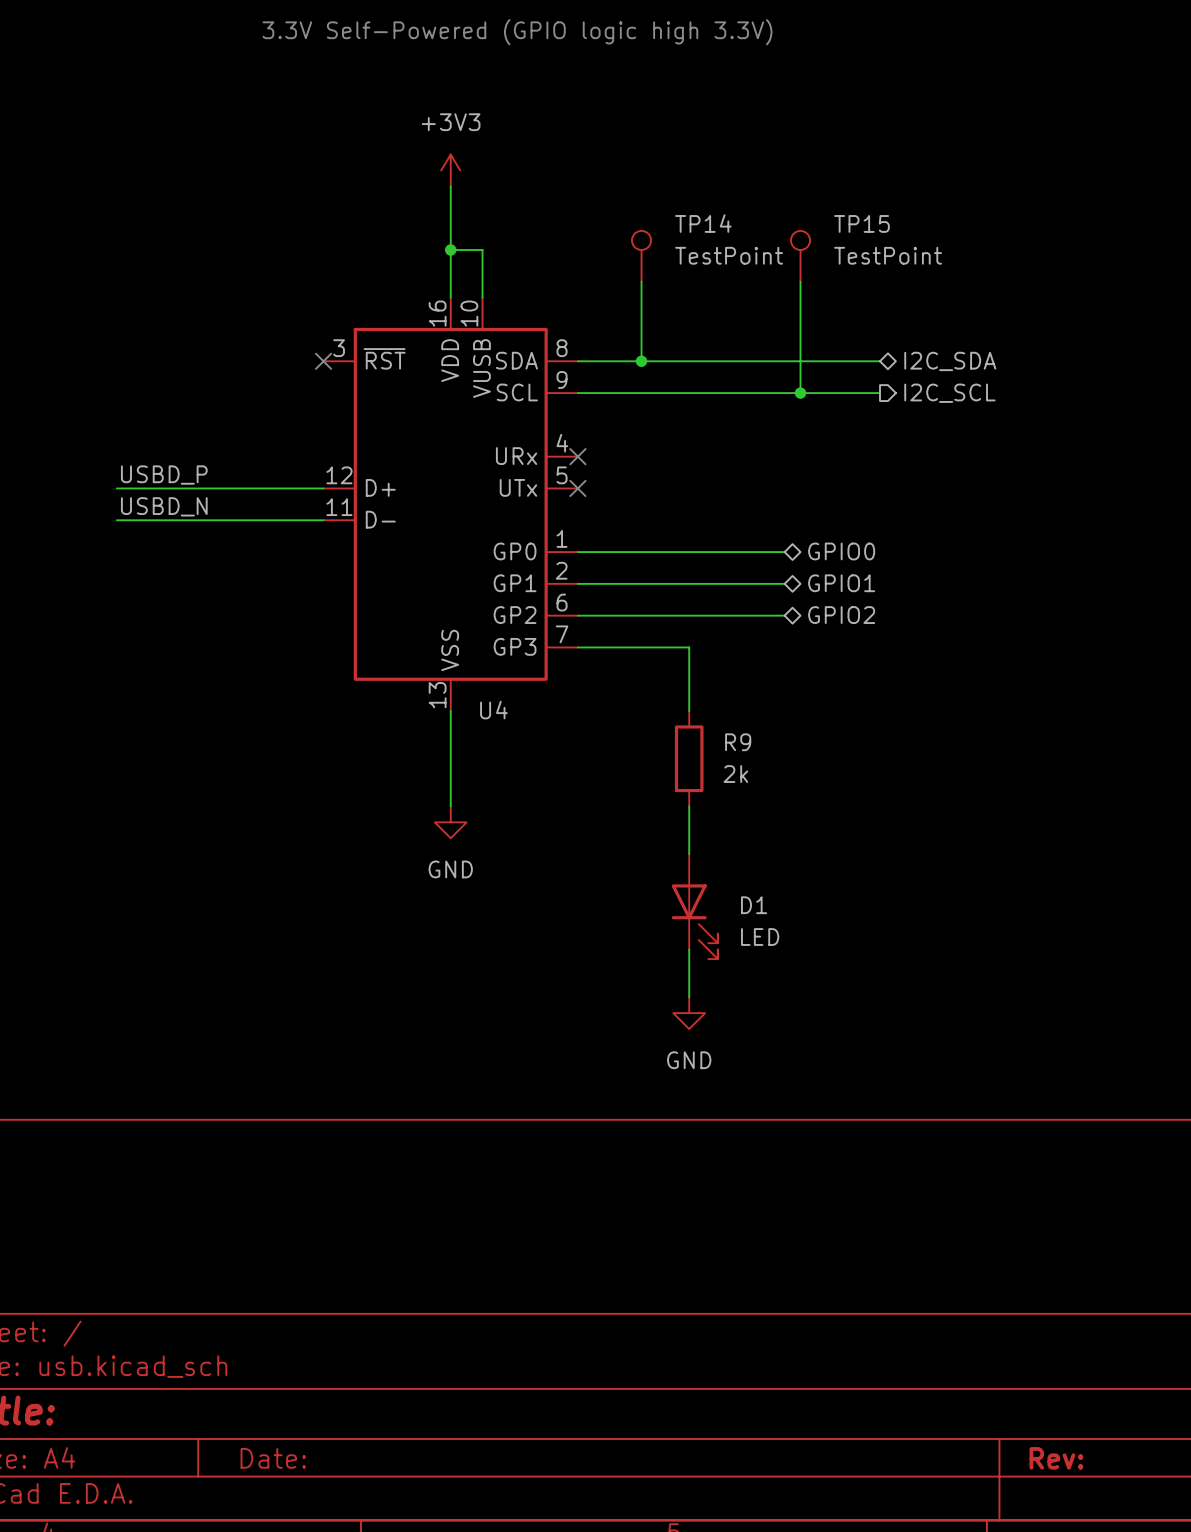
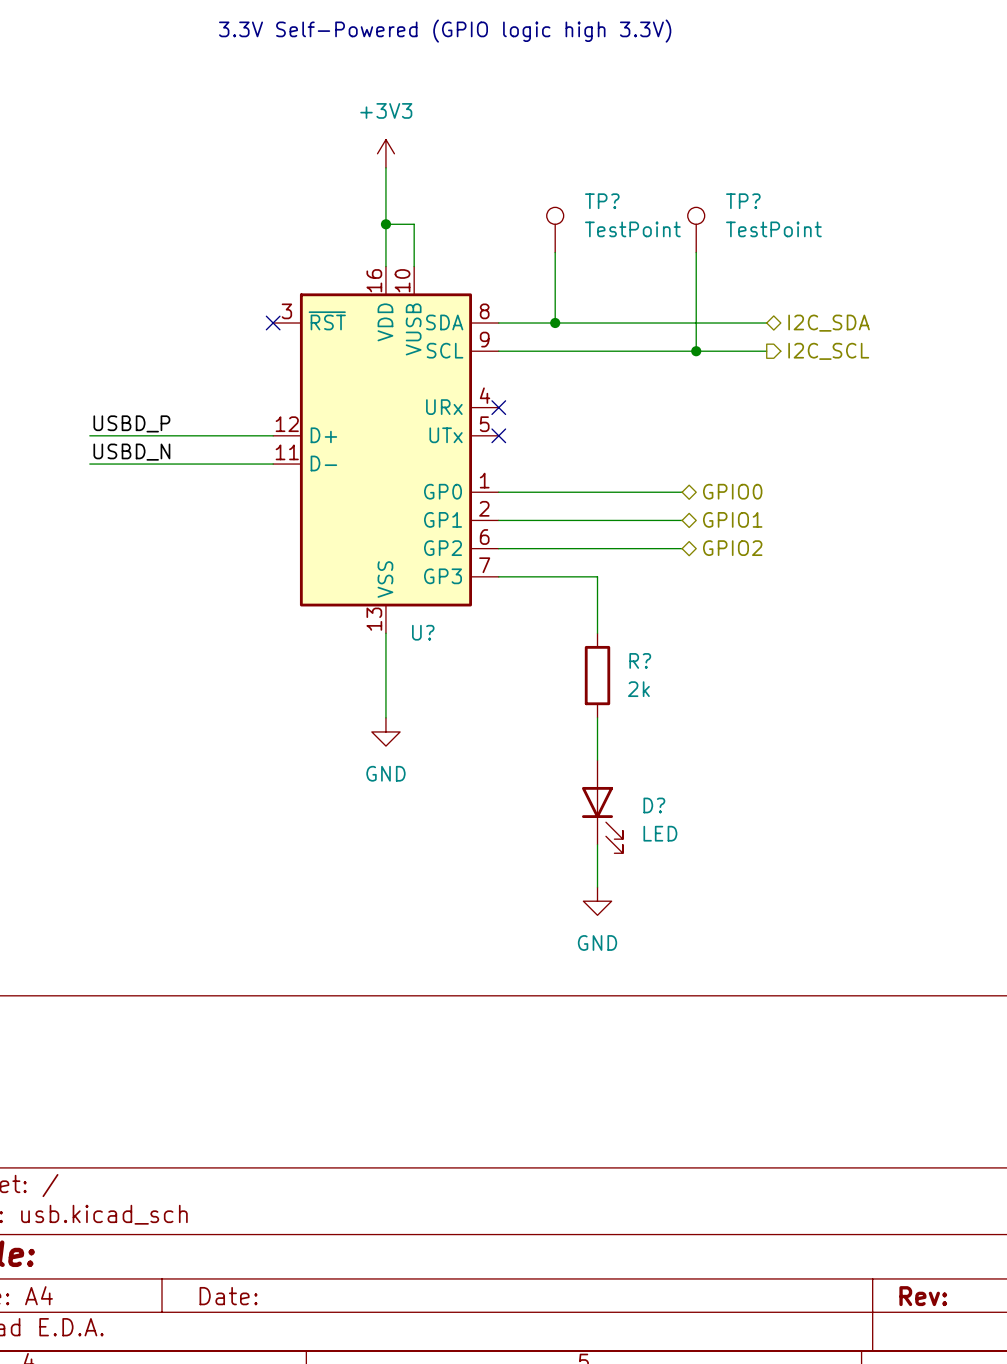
TP14 name: TP14 (703, 223) -> TP? (602, 201)
TP15 name: TP15 (861, 223) -> TP? (743, 201)
U4 name: U4 (493, 710) -> U? (423, 632)
R9 name: R9 (738, 742) -> R? (640, 660)
D1 name: D1 (754, 905) -> D? (654, 805)

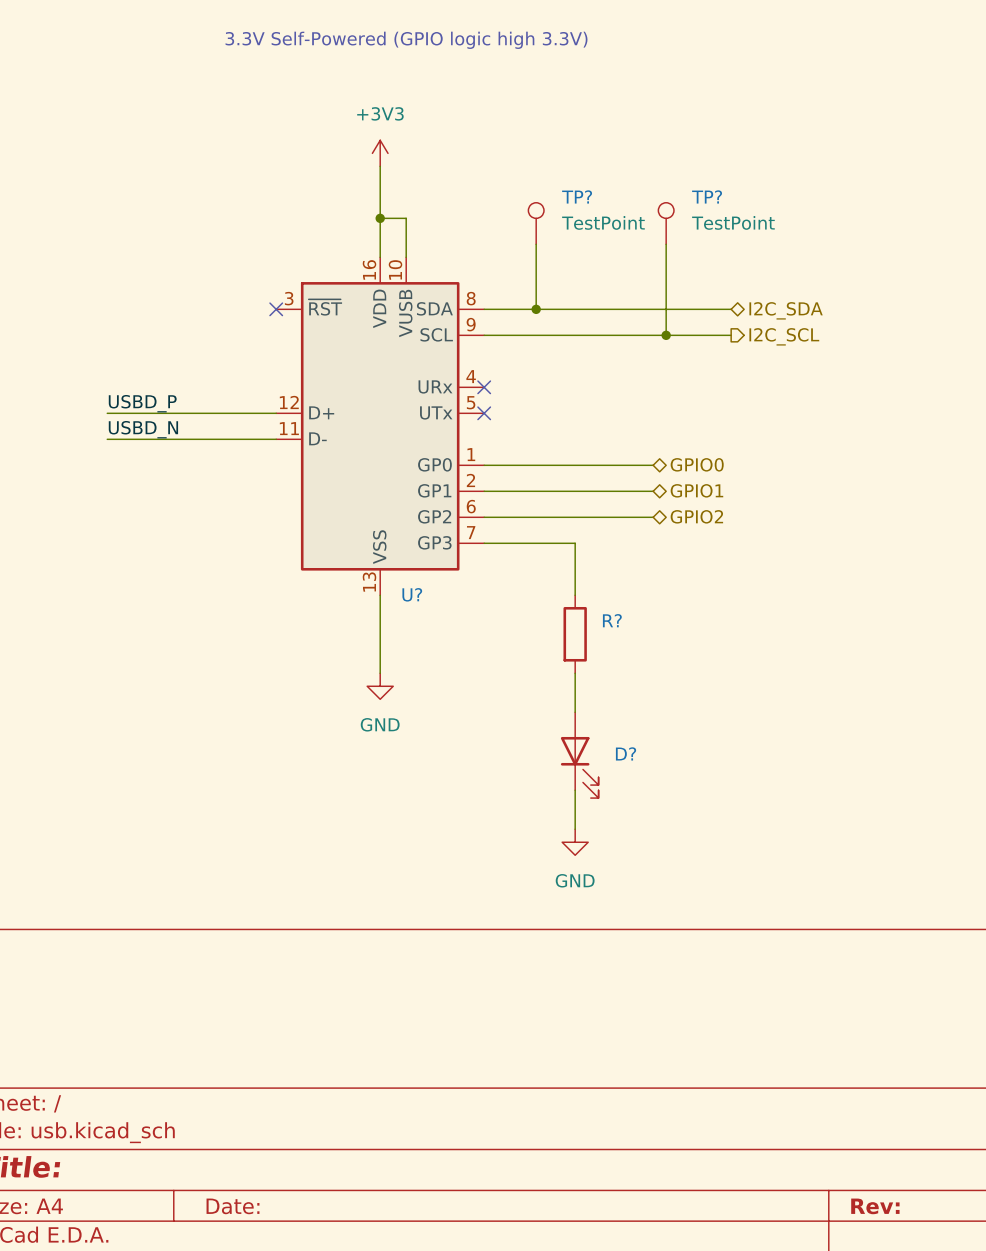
R? value: 2k (638, 689) -> none
D? value: LED (660, 833) -> none

